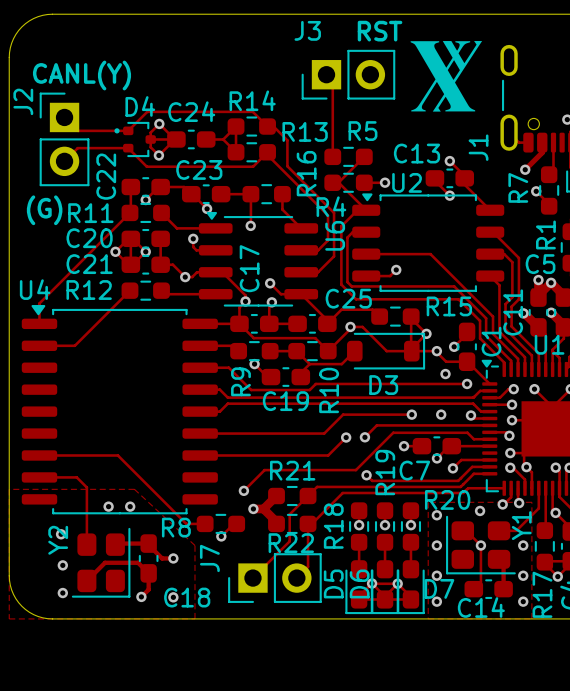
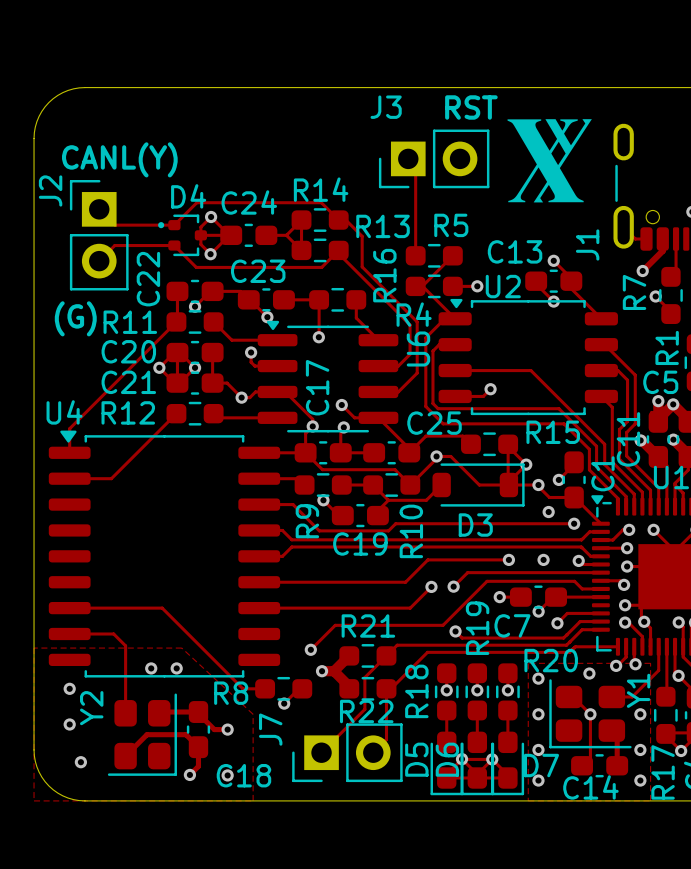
via: none -> (69, 688)
via: (61, 534) -> none
via: none -> (69, 724)
via: (62, 565) -> none
via: none -> (80, 762)
via: (62, 593) -> none

